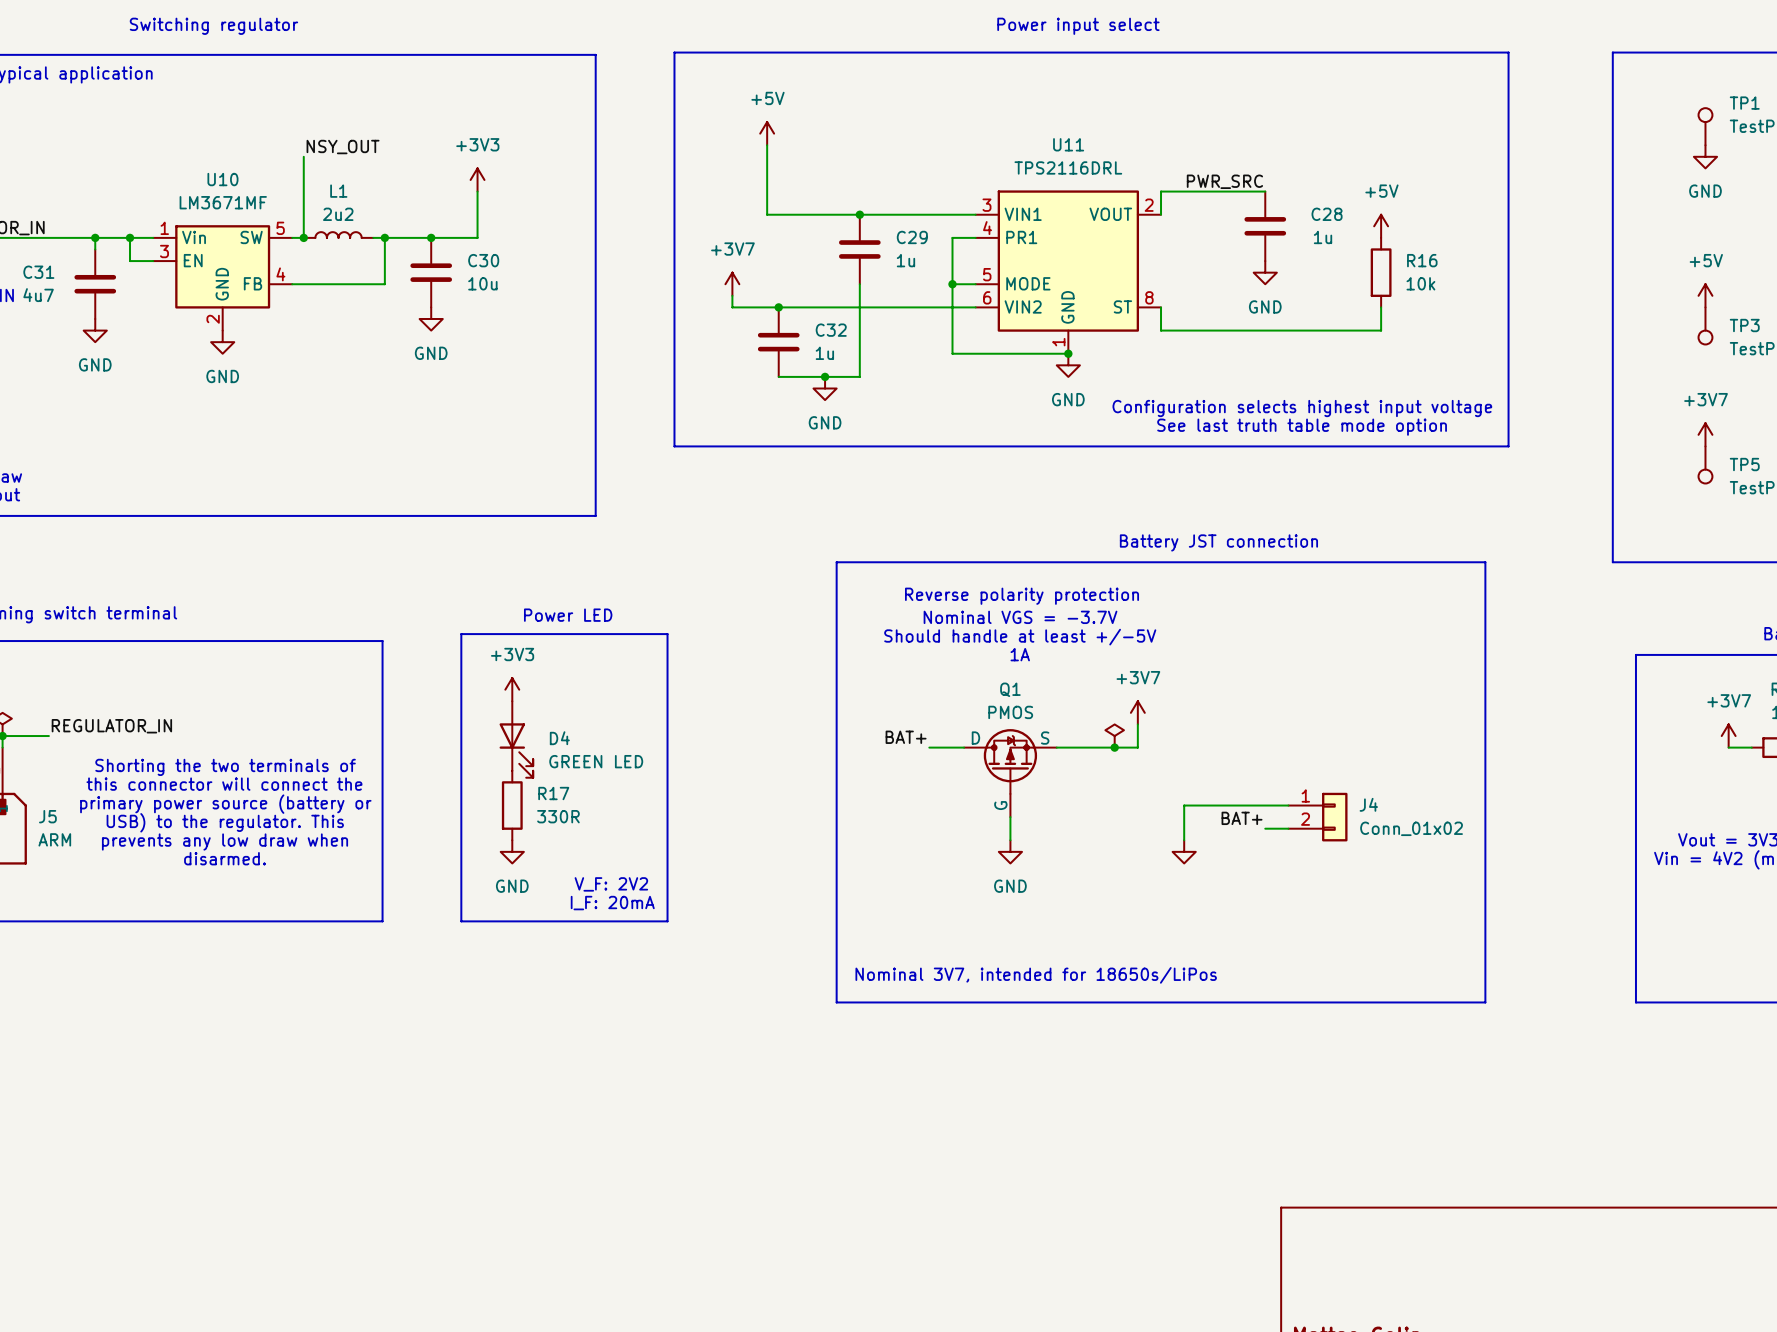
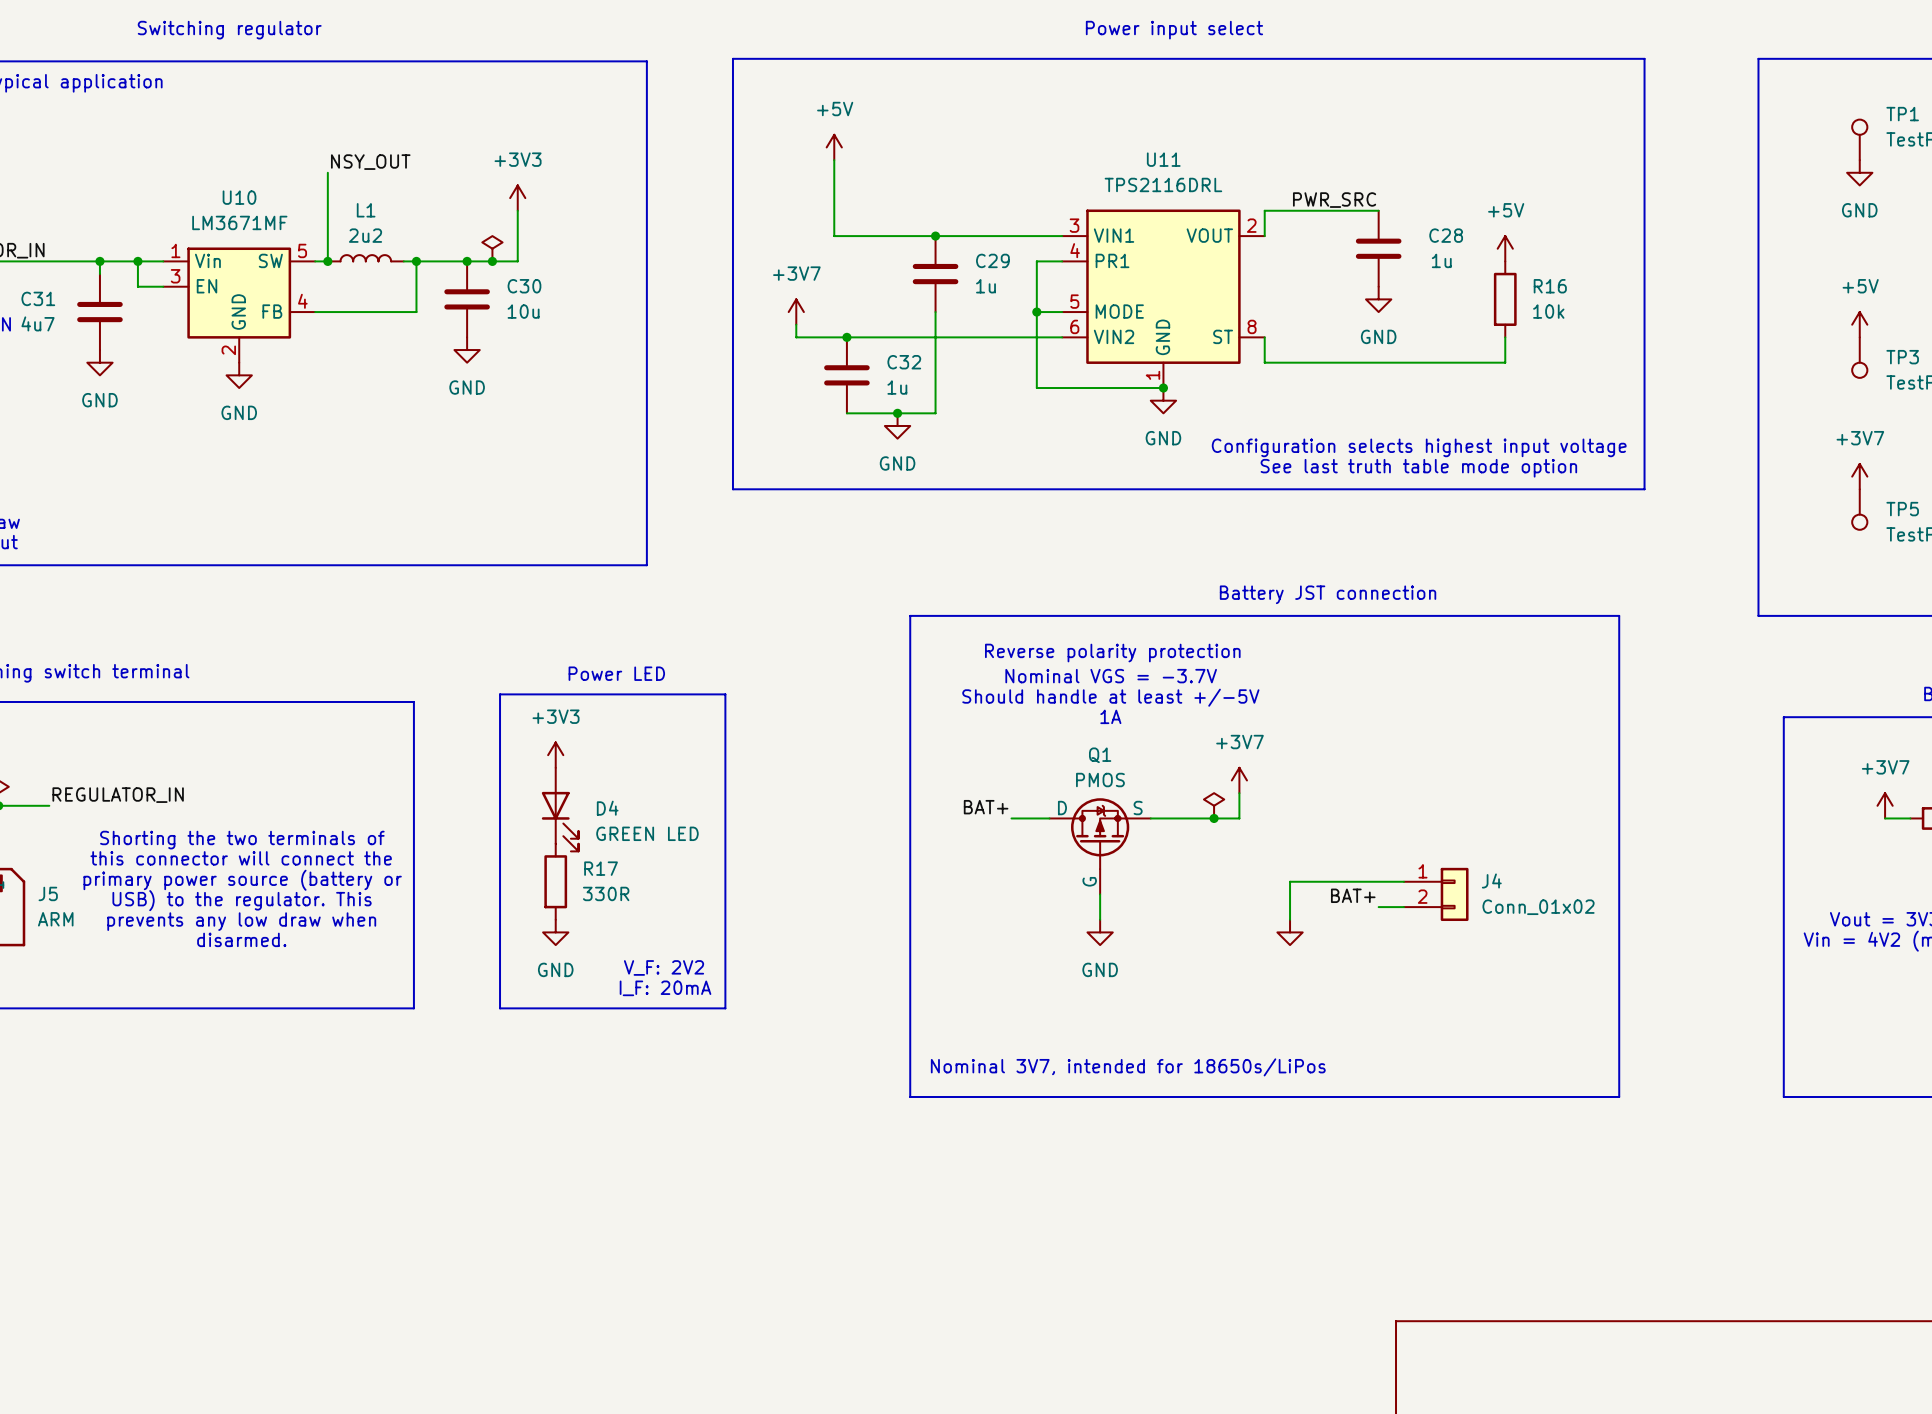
power symbol: none -> (492, 248)
junction: none -> (492, 261)

